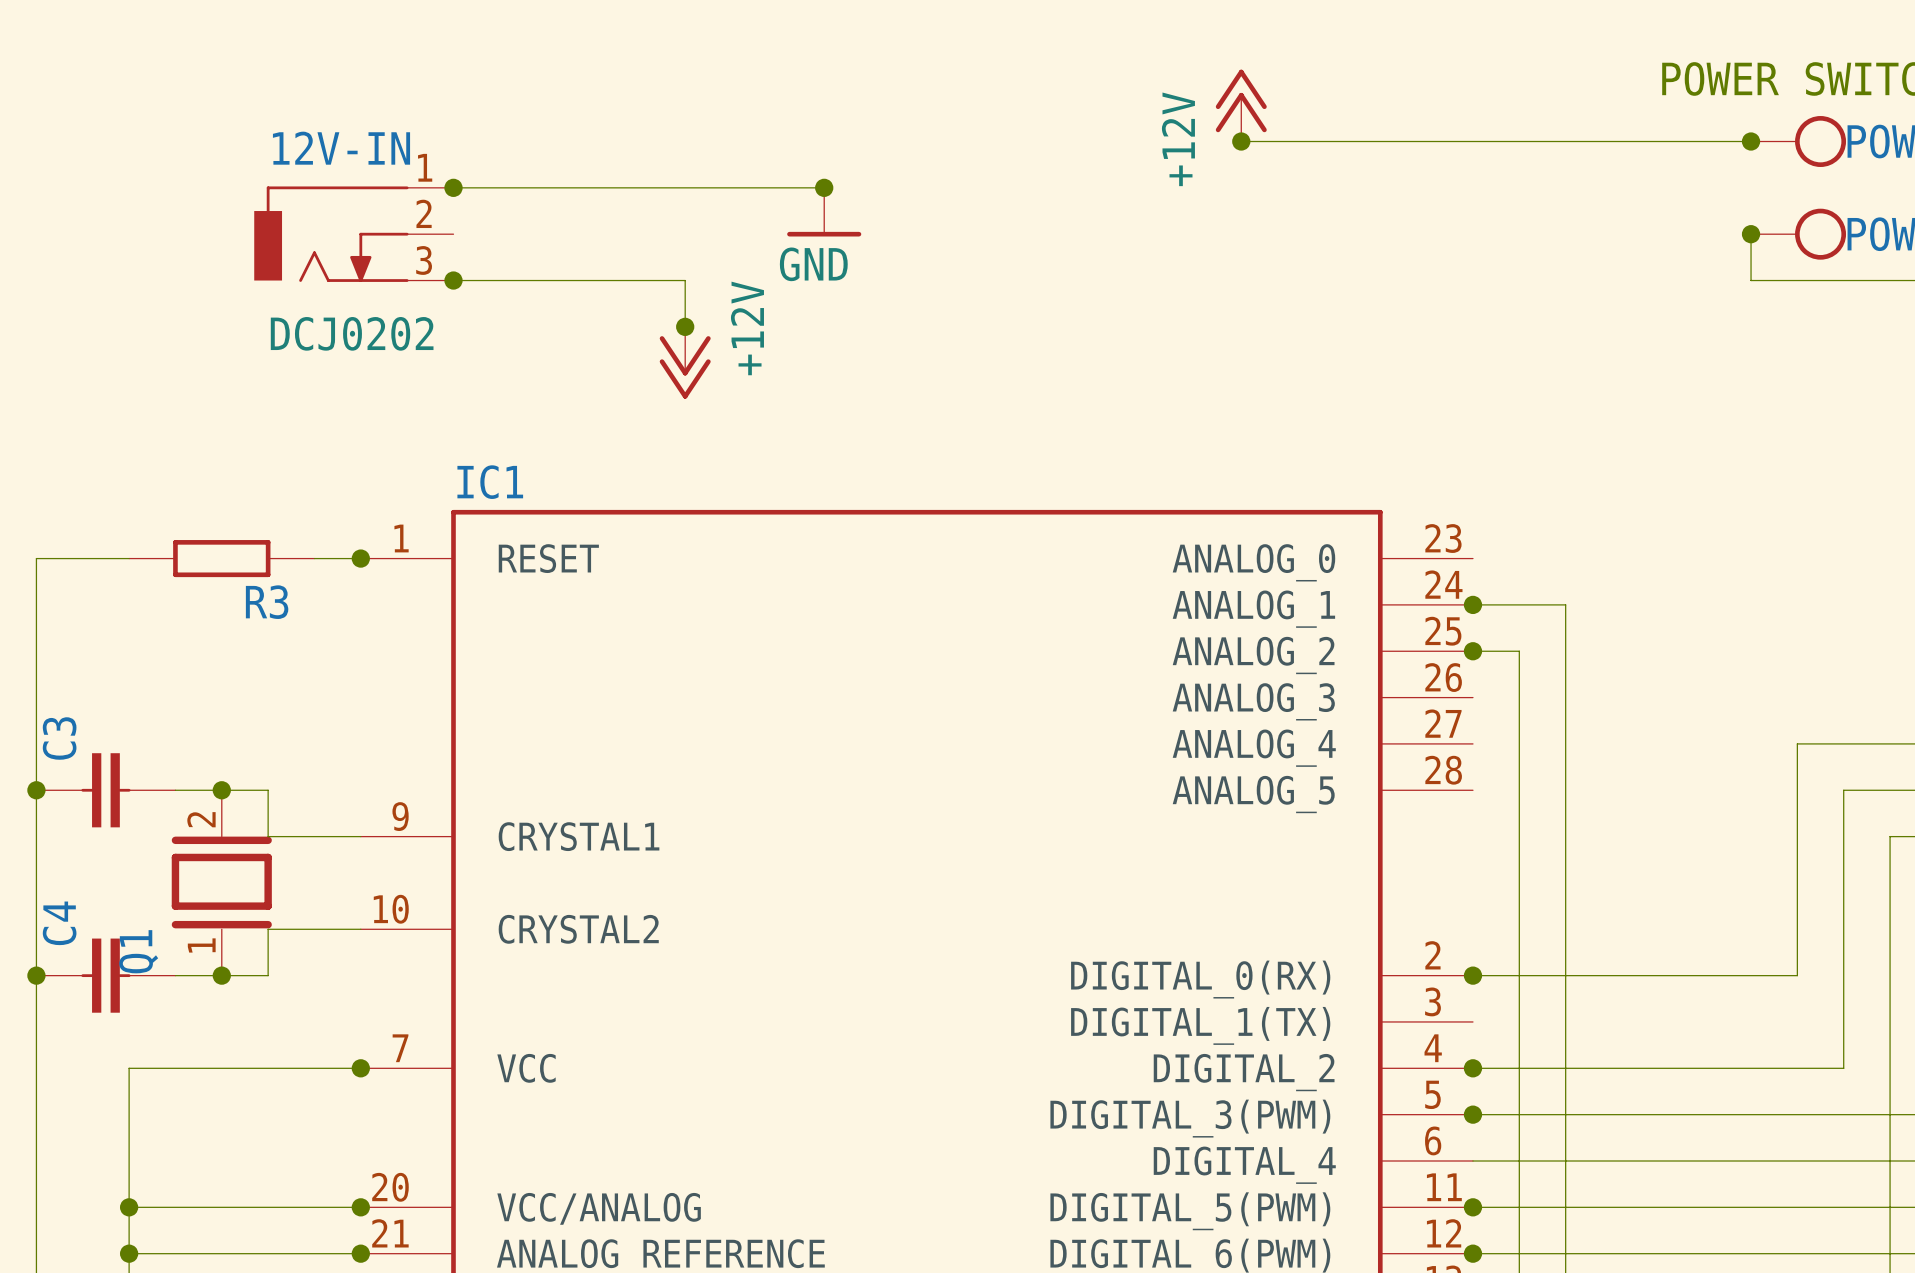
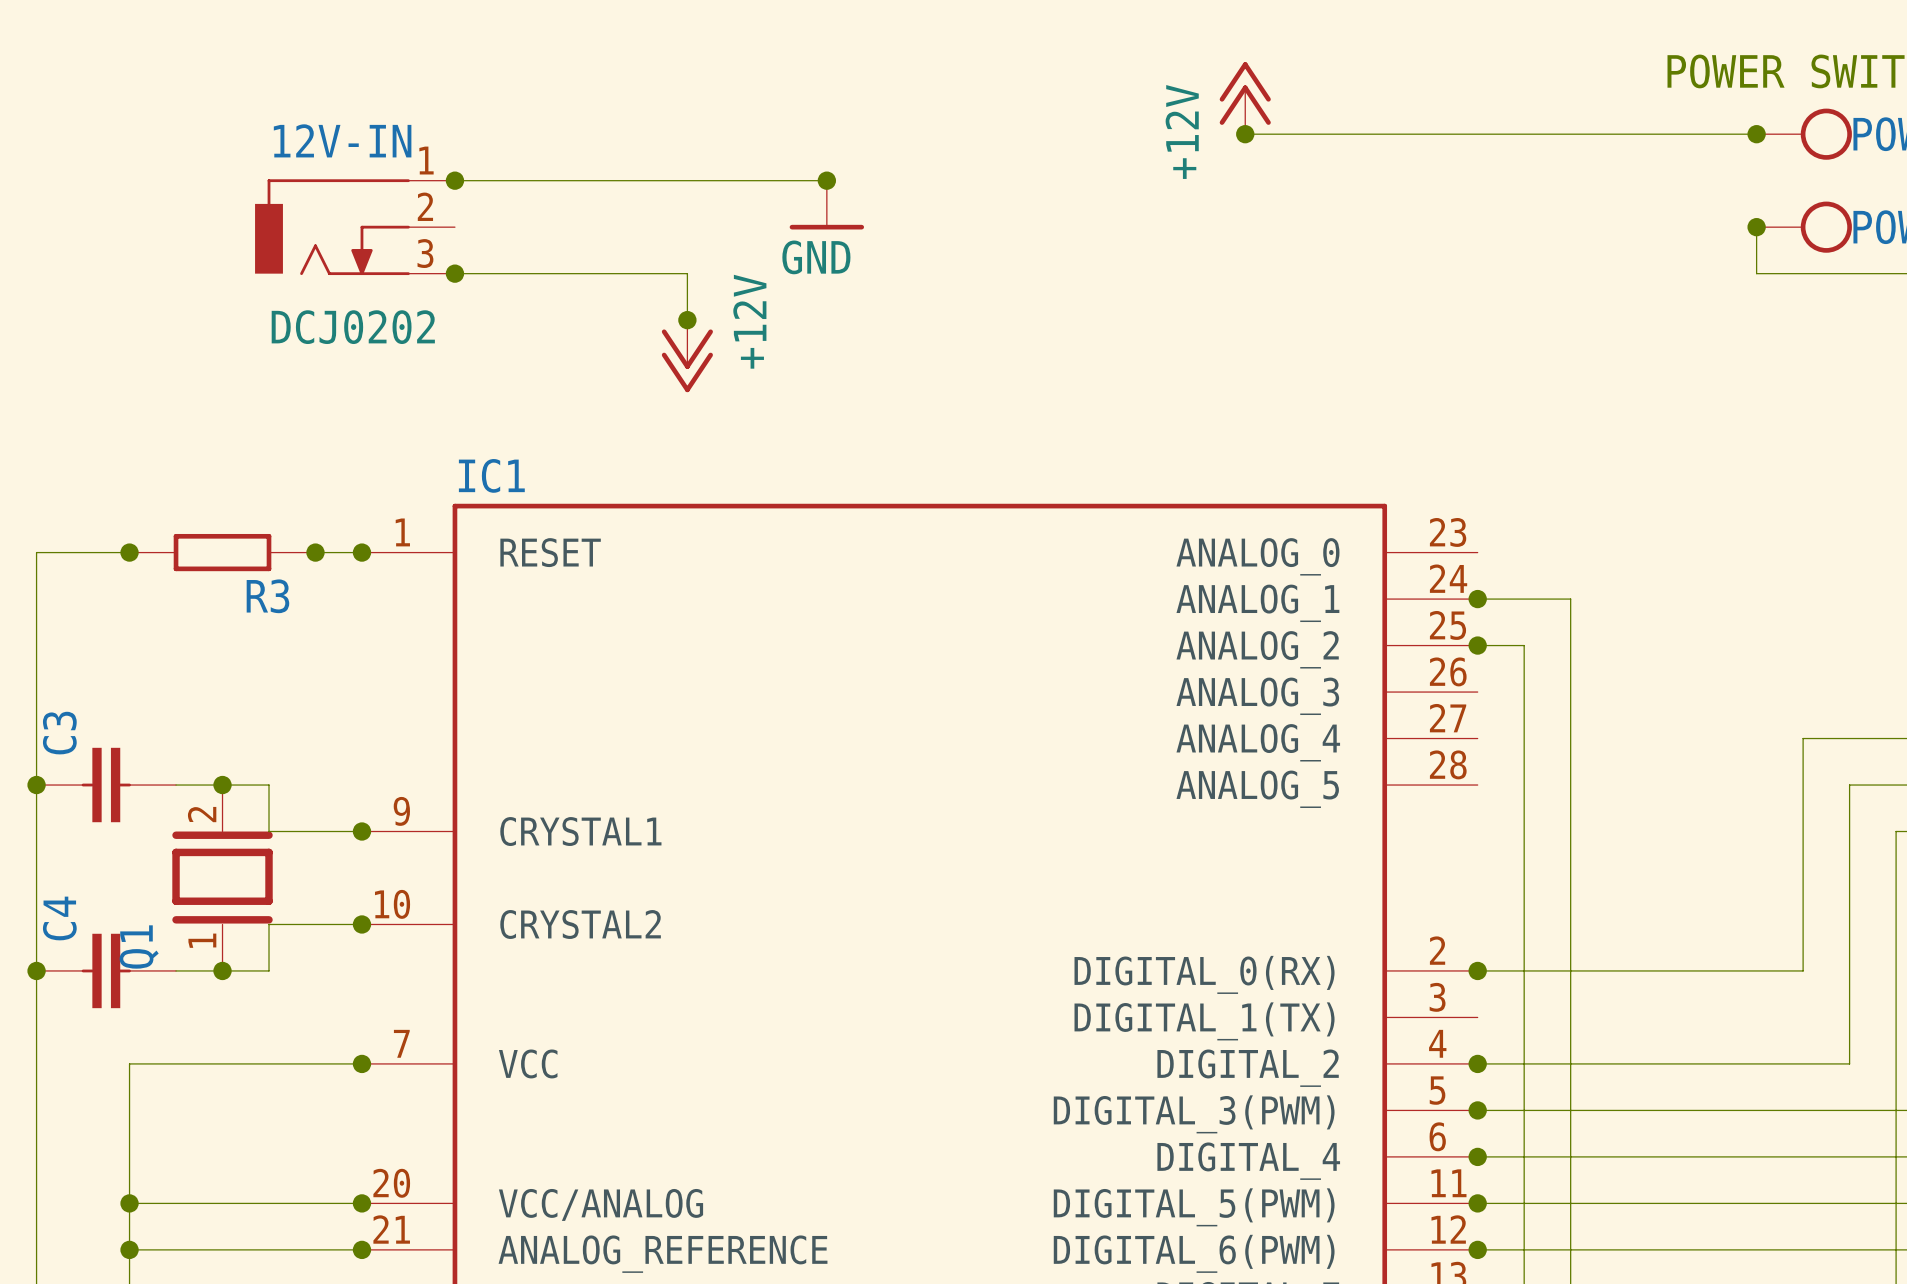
junction: none -> (129, 552)
junction: none -> (315, 552)
junction: none -> (361, 831)
junction: none -> (361, 924)
junction: none -> (1477, 1156)

